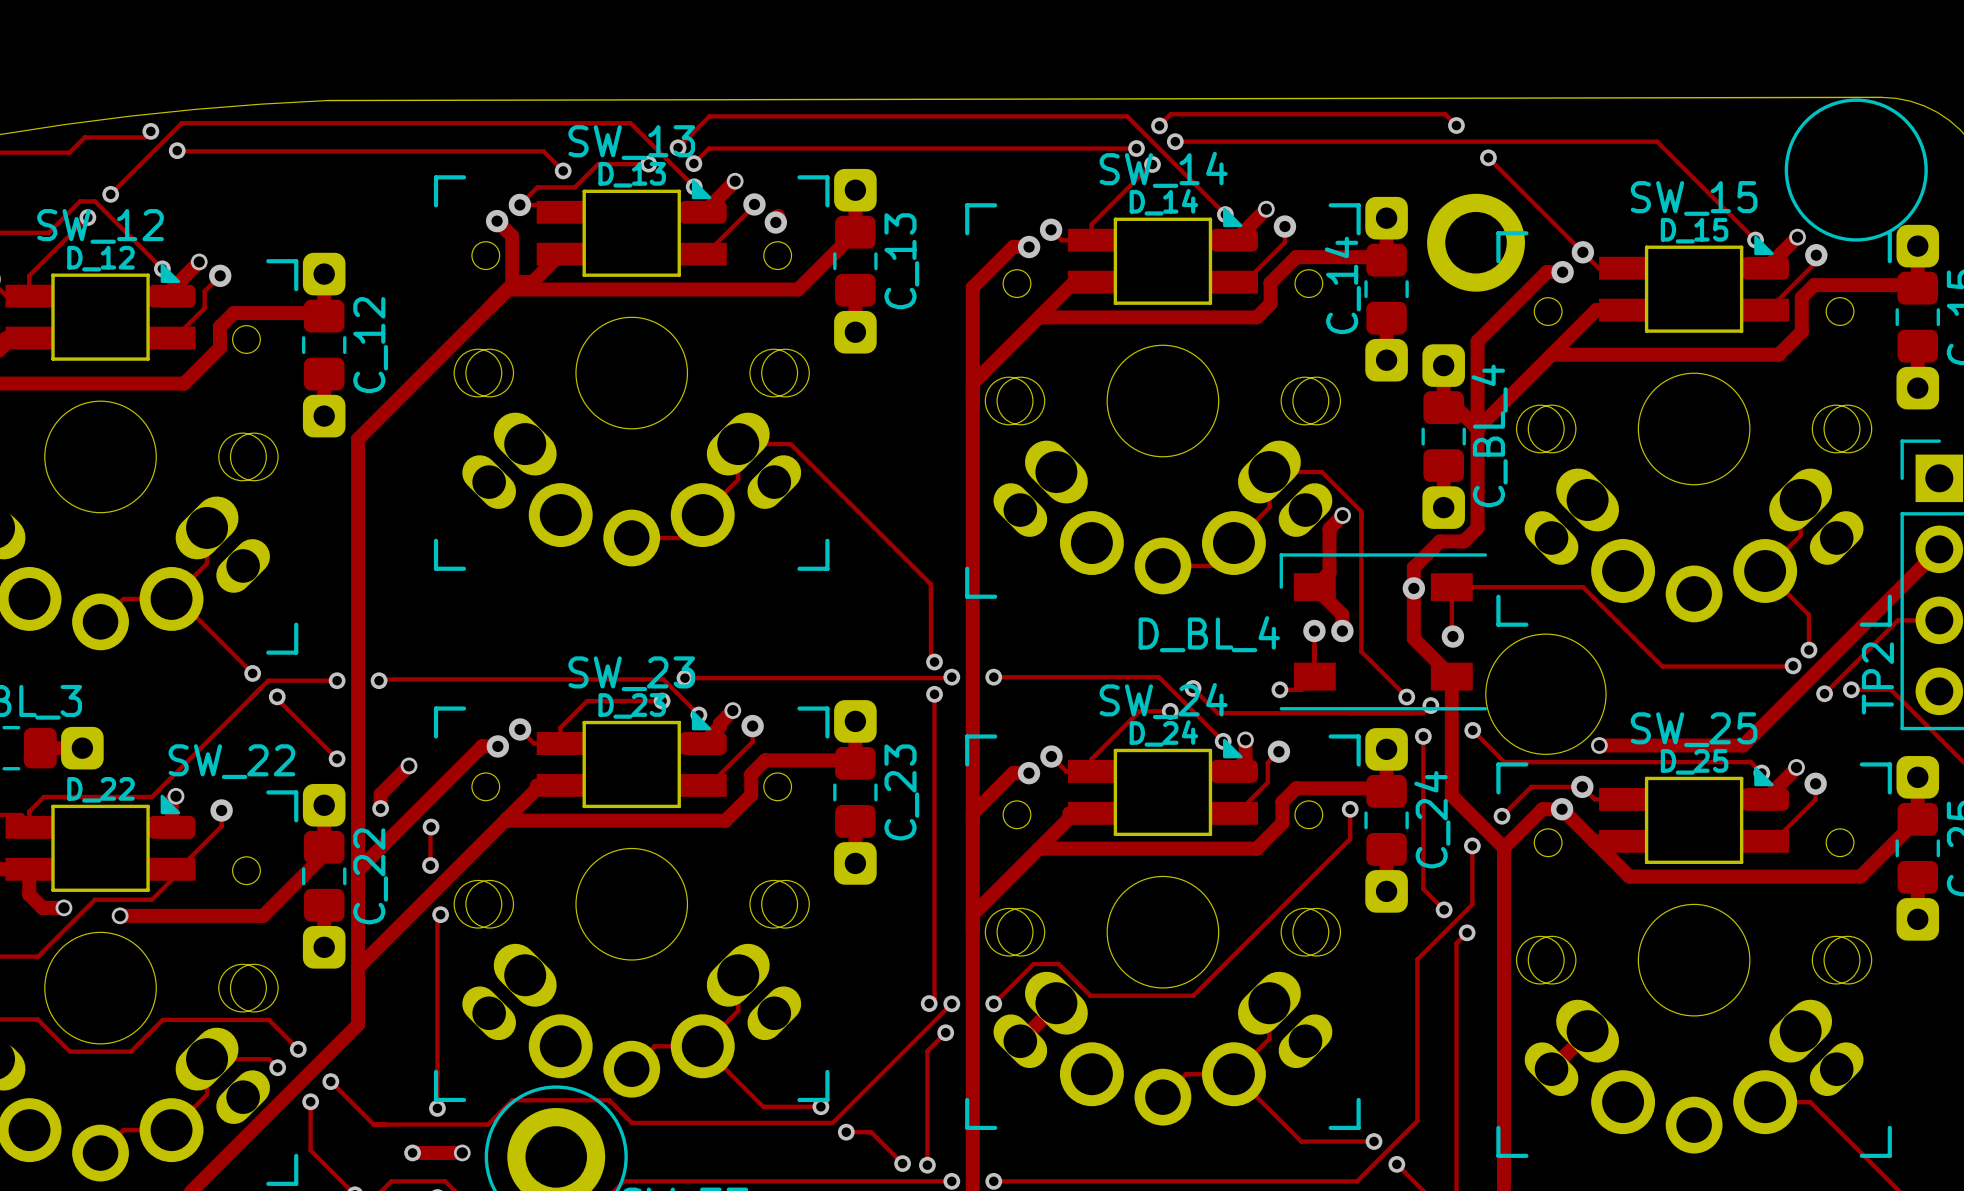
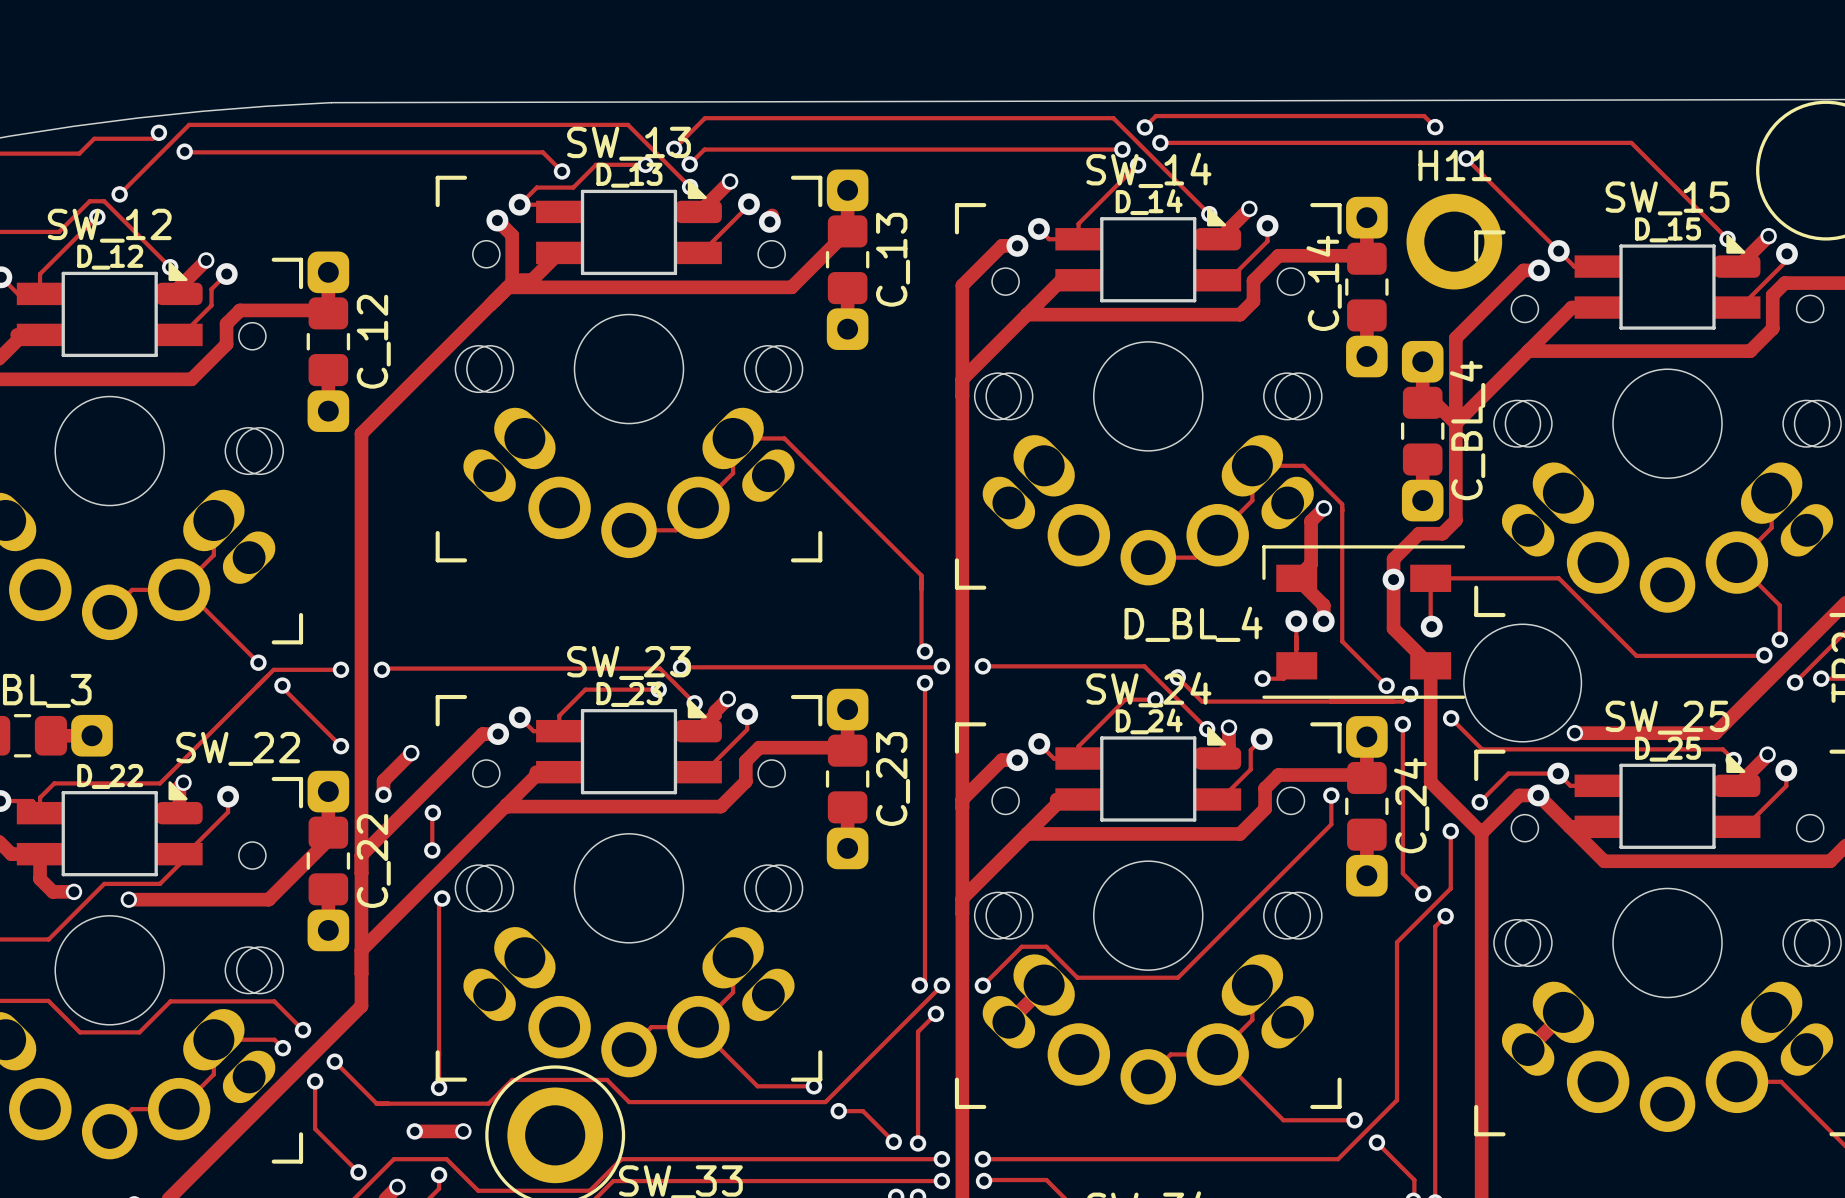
H11 name: none -> H11 (1454, 165)

